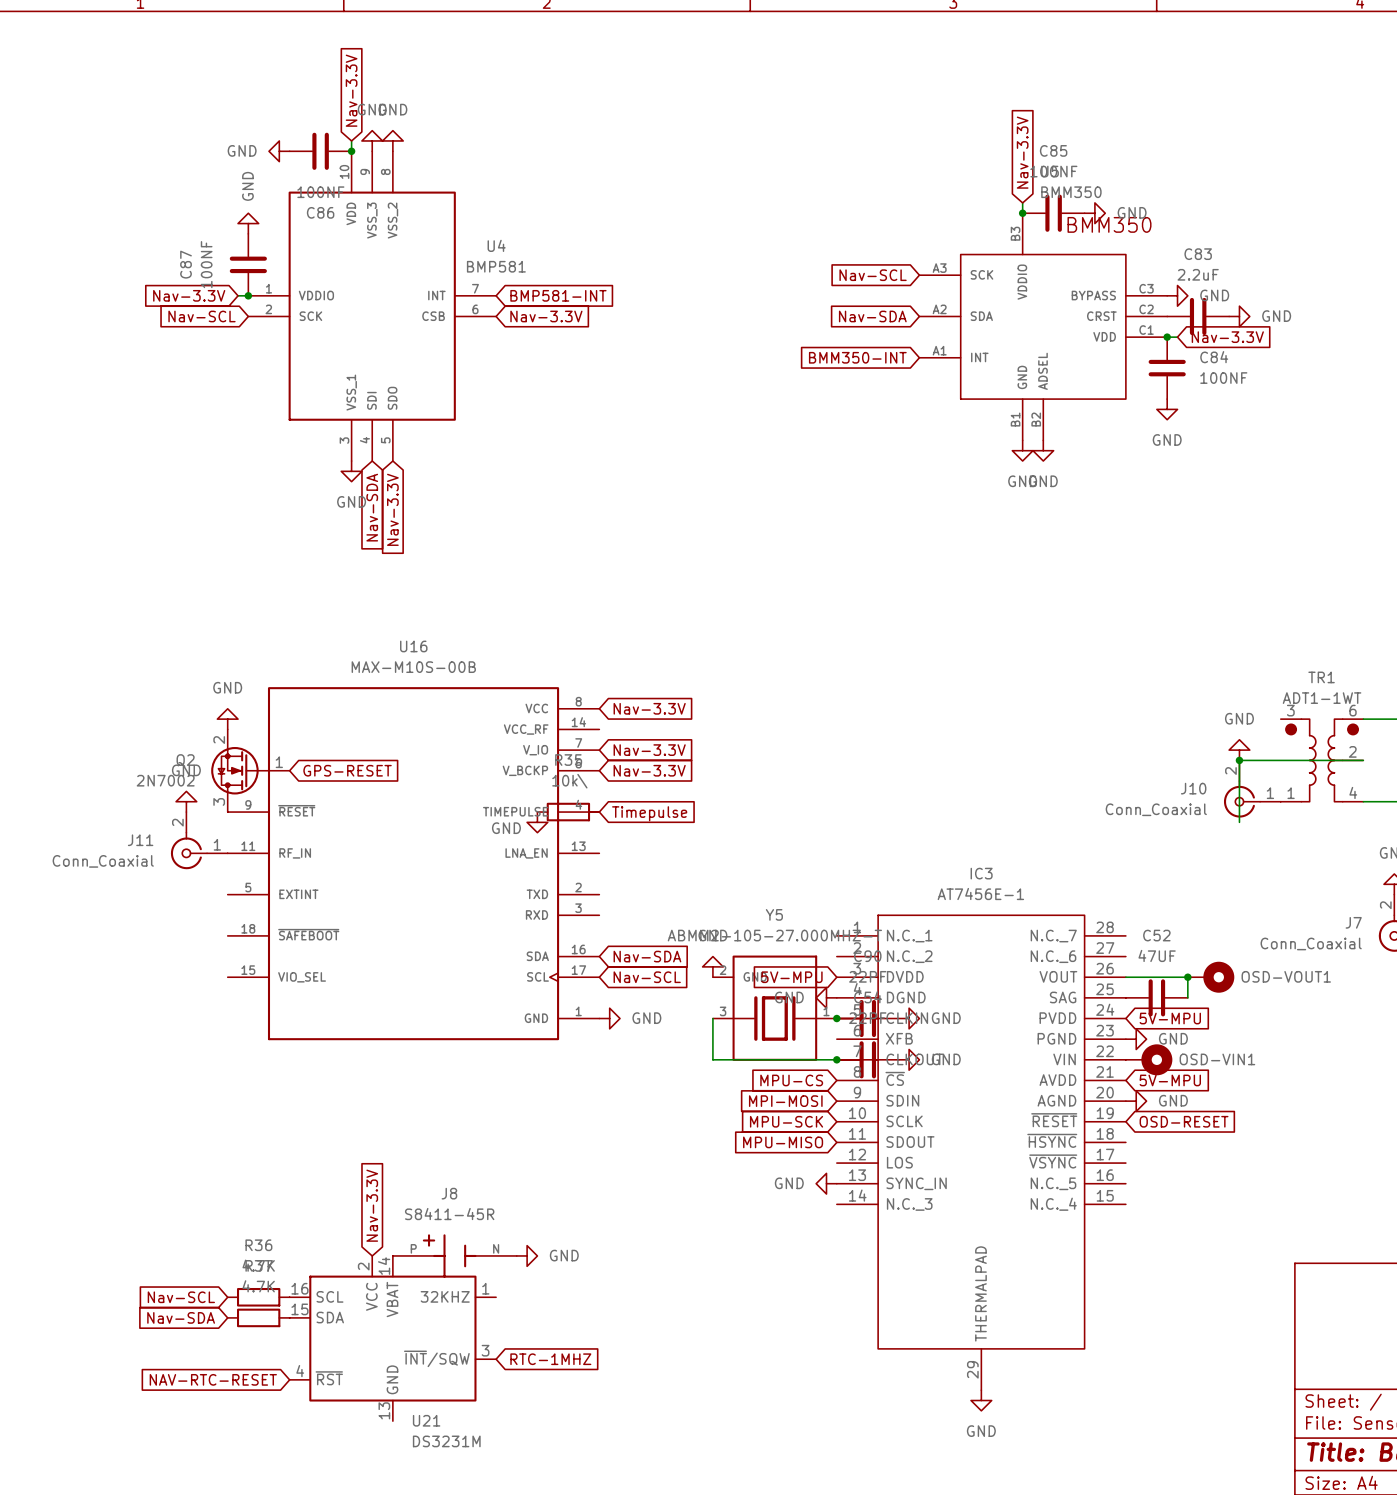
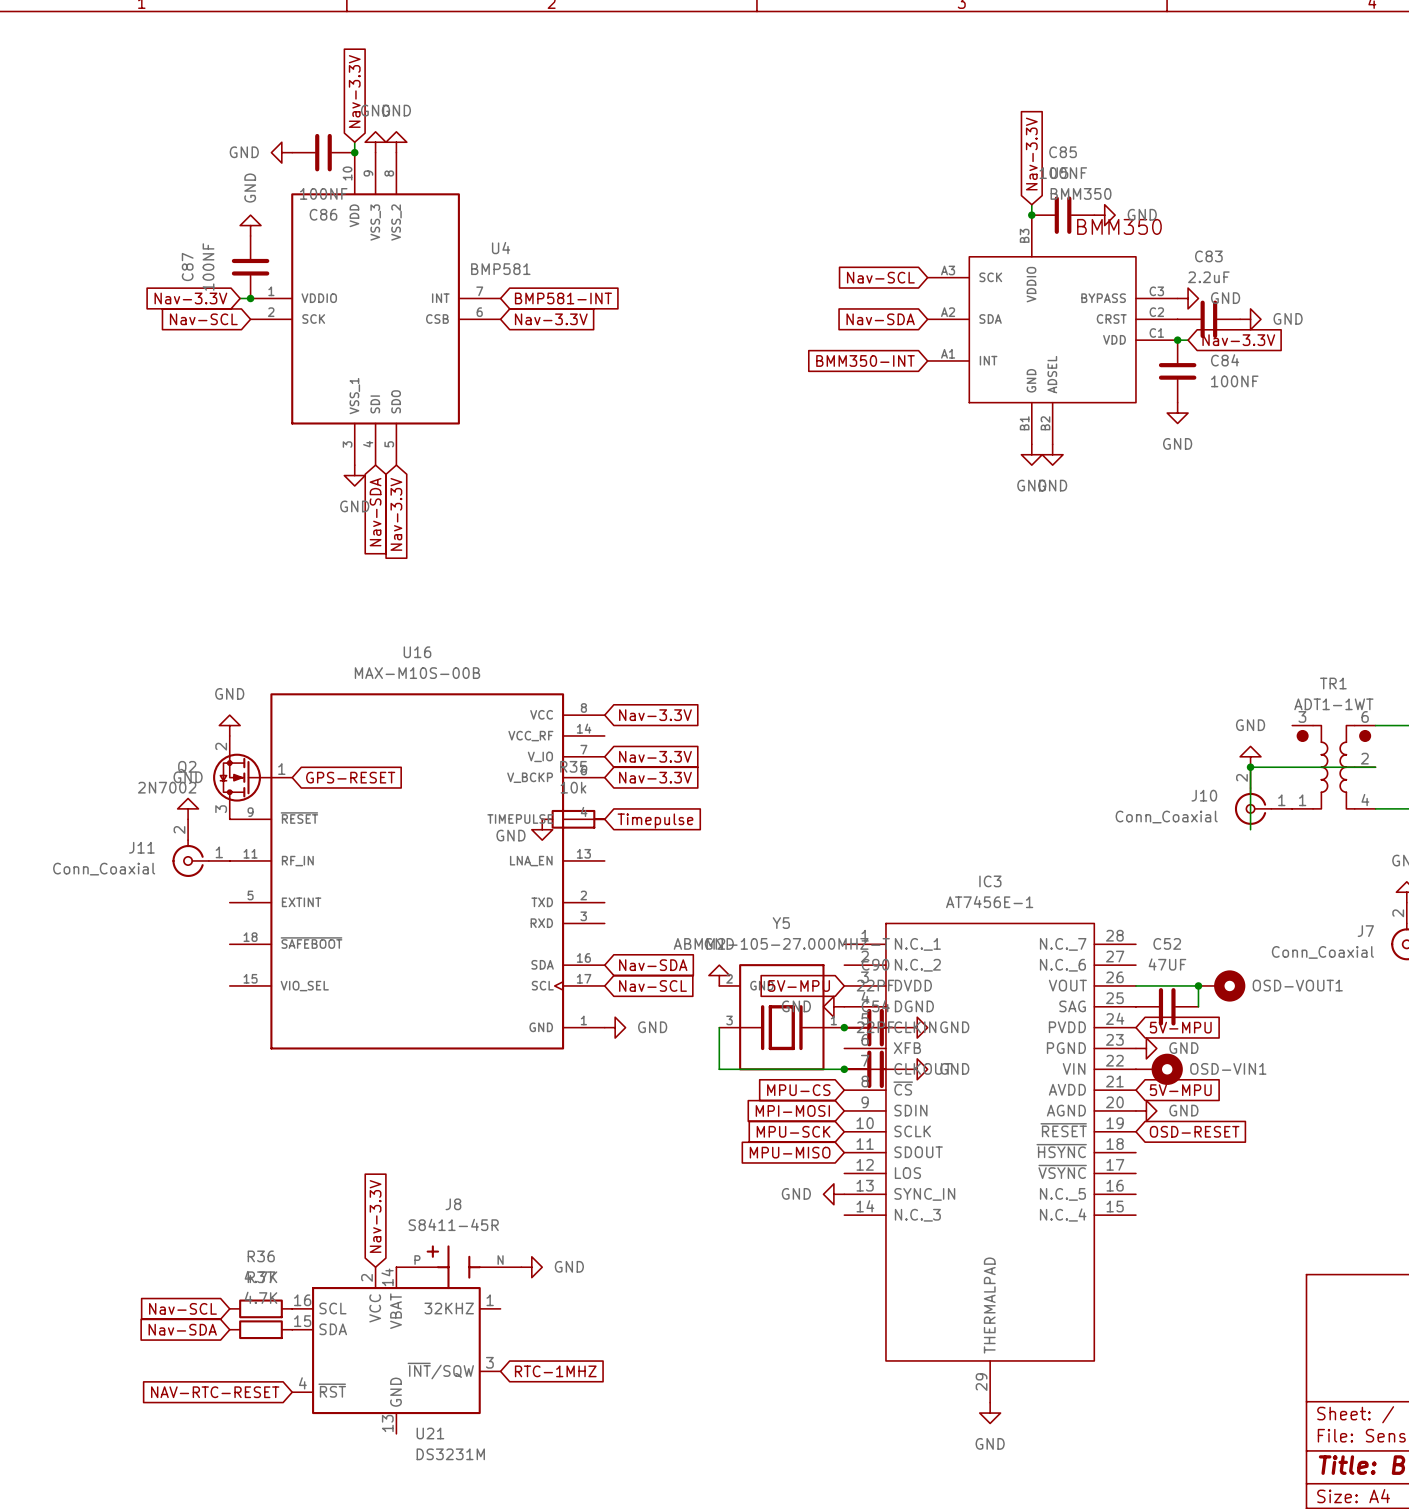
R35 value: 10k\ (569, 781) -> 10k (573, 787)

